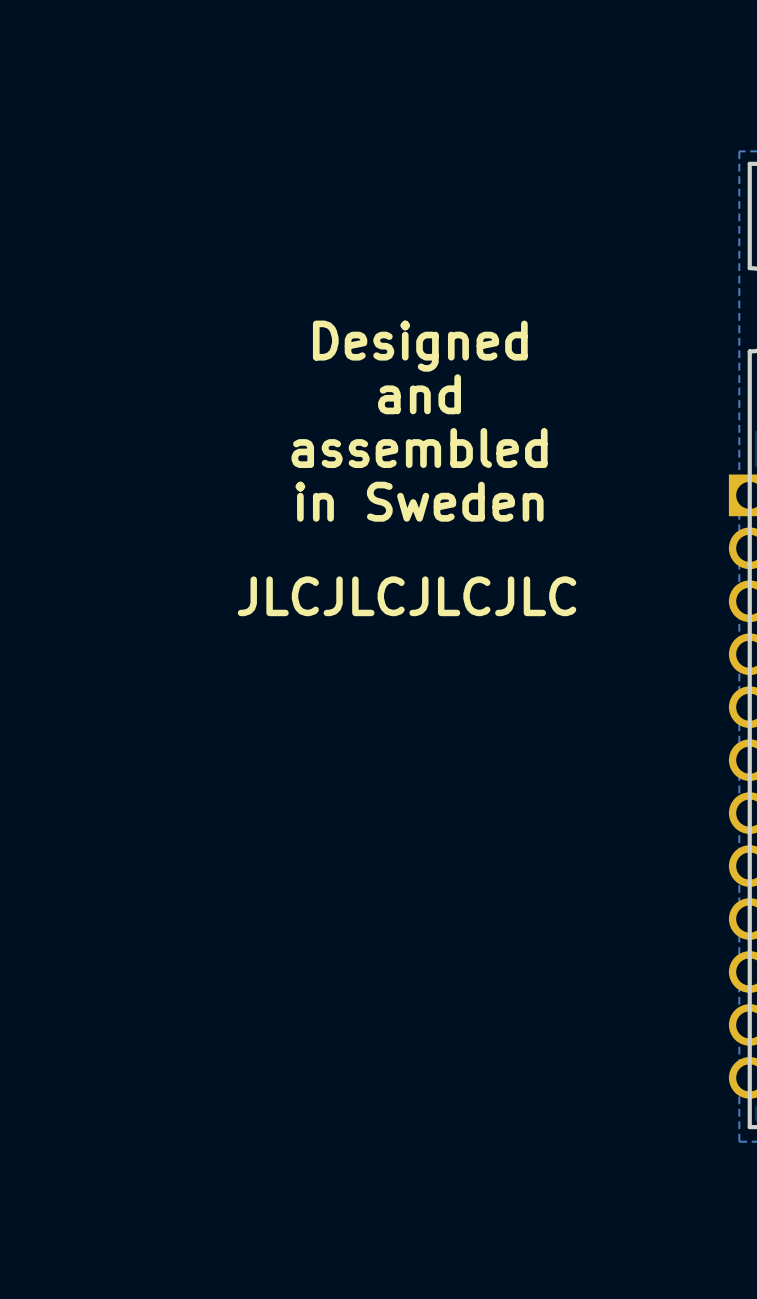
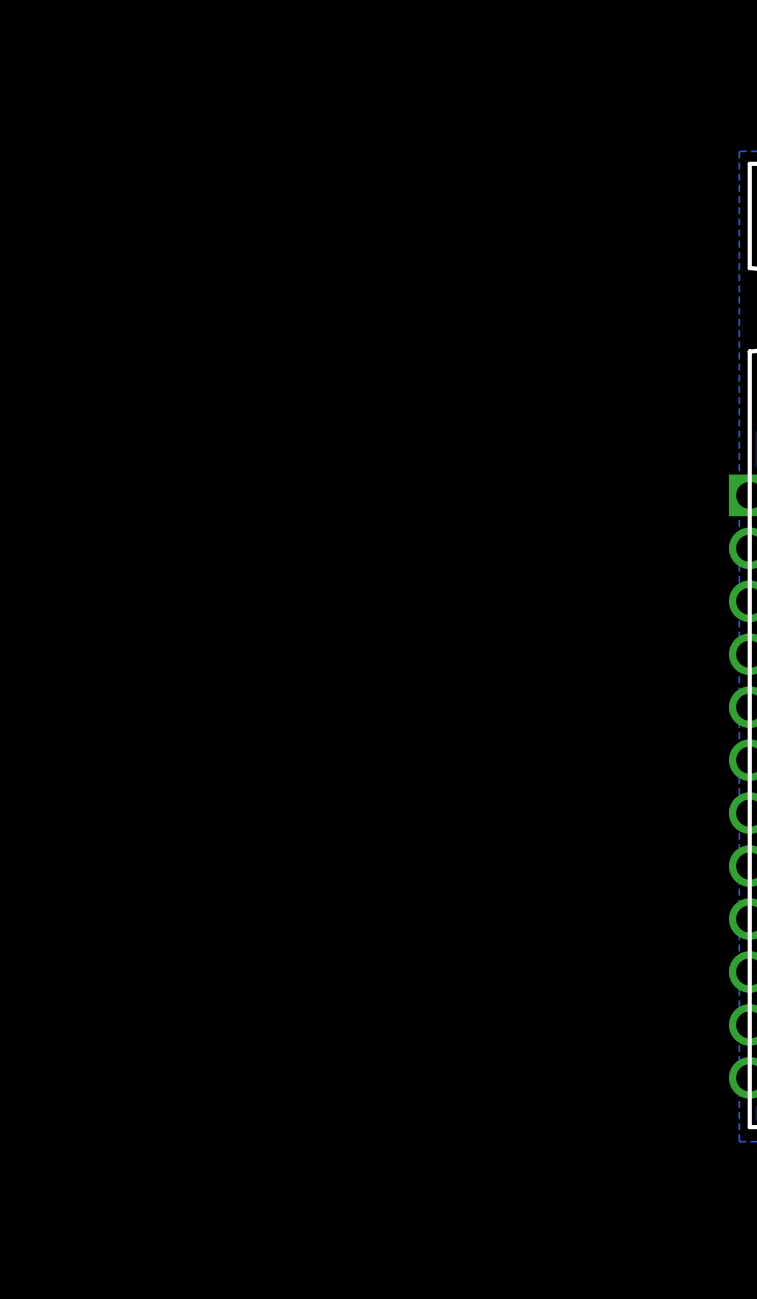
text: Designed (420, 346) -> none
text: and (419, 394) -> none
text: assembled (419, 447) -> none
text: in Sweden (419, 501) -> none
text: JLCJLCJLCJLC (407, 596) -> none

